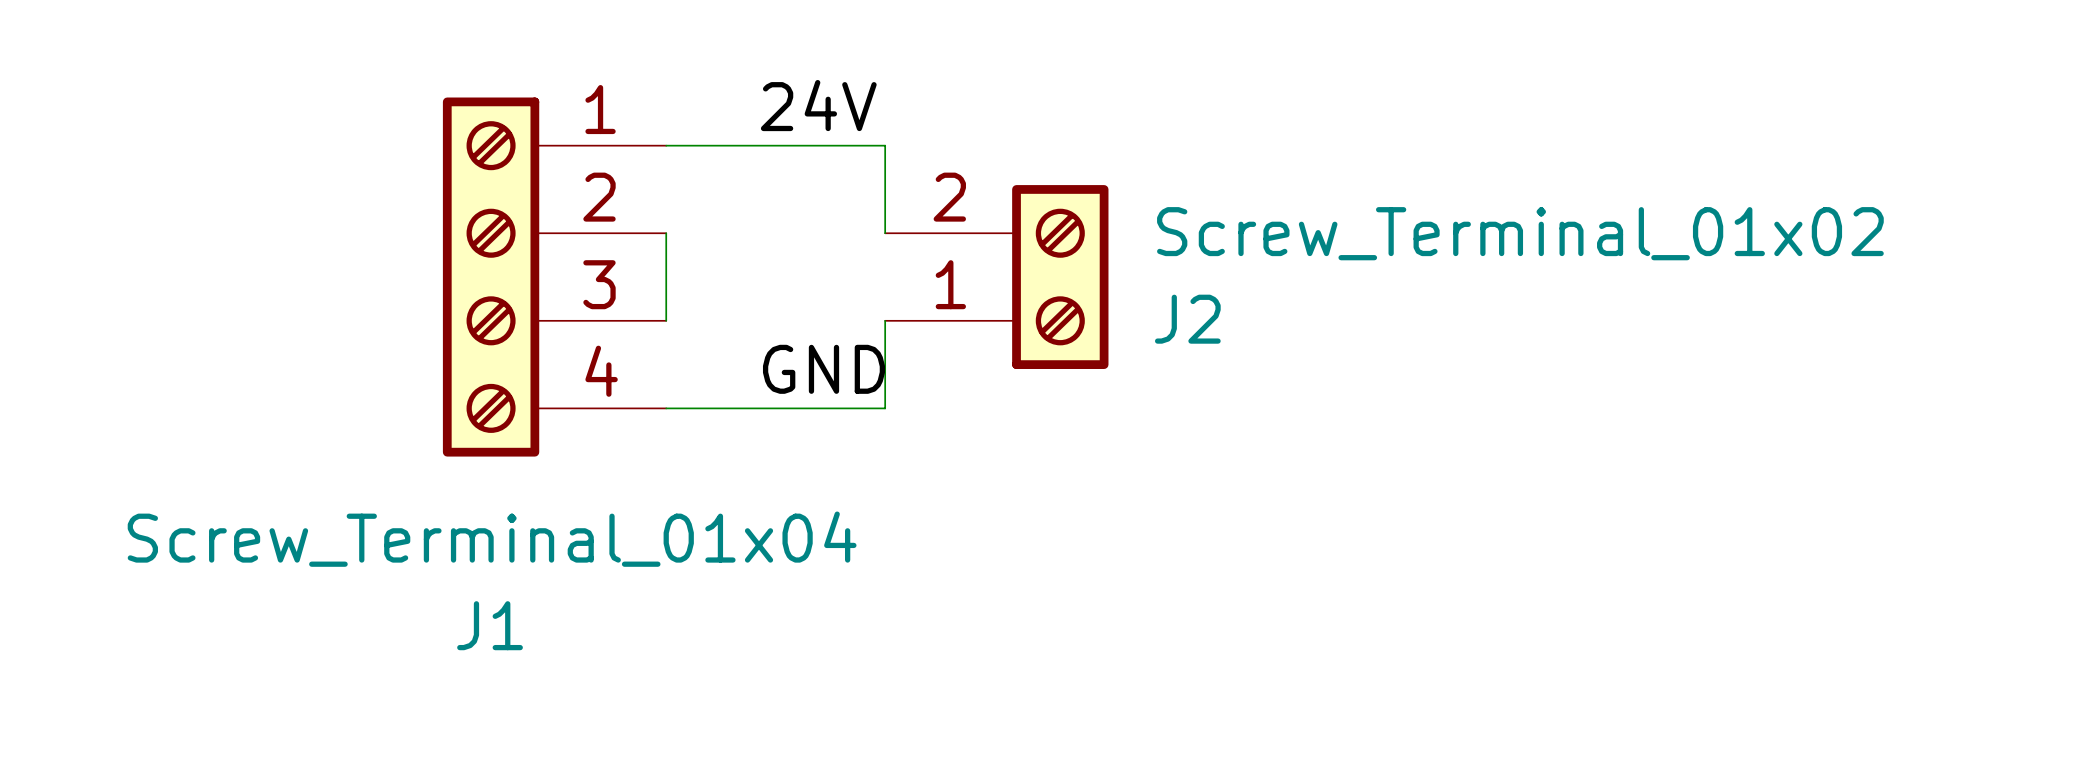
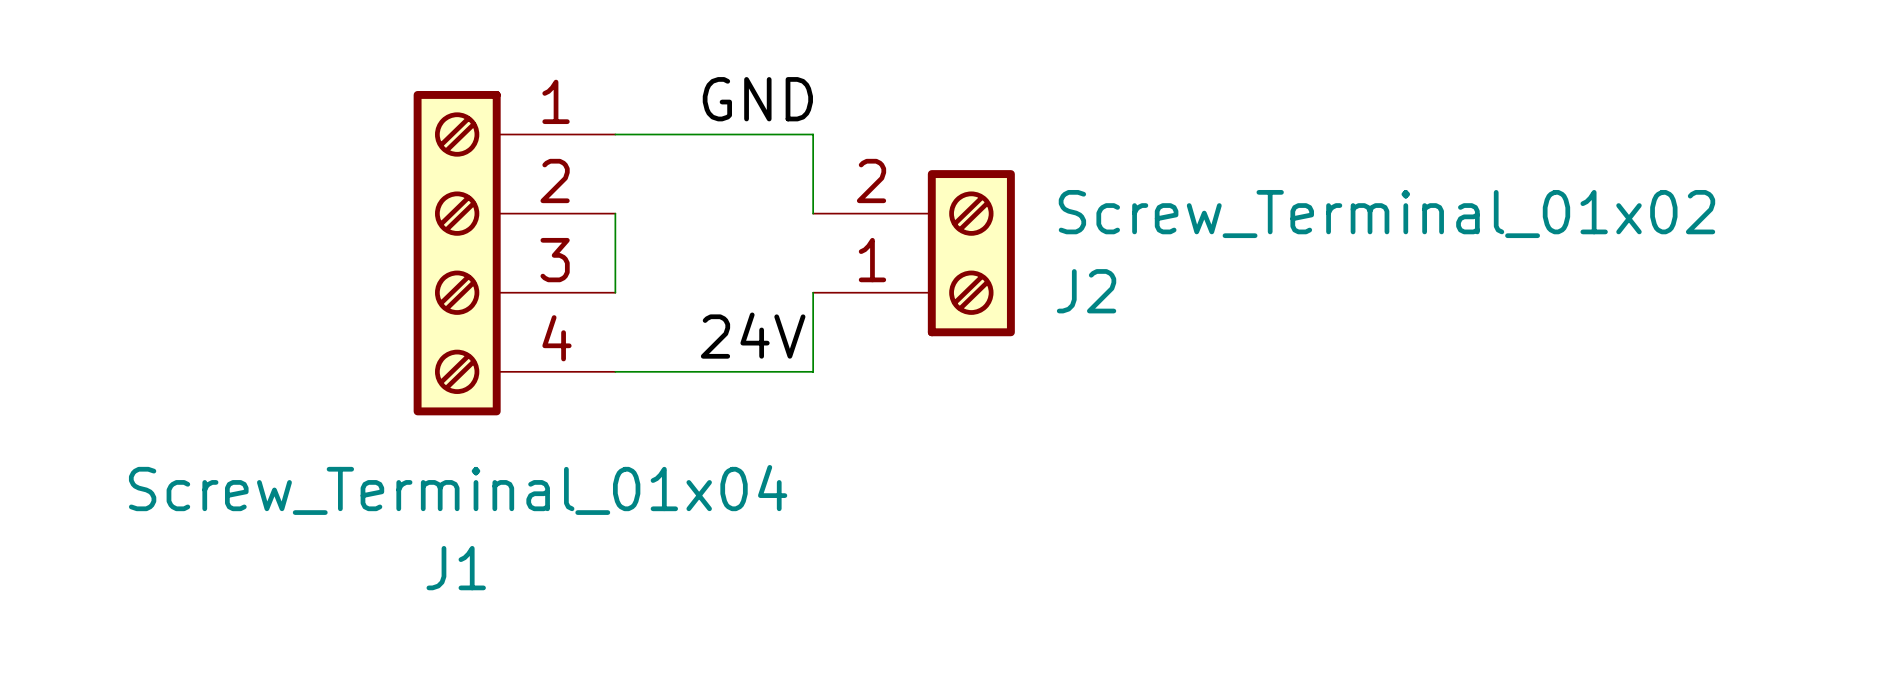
label: 24V (818, 105) -> GND (757, 99)
label: GND (823, 369) -> 24V (753, 335)

